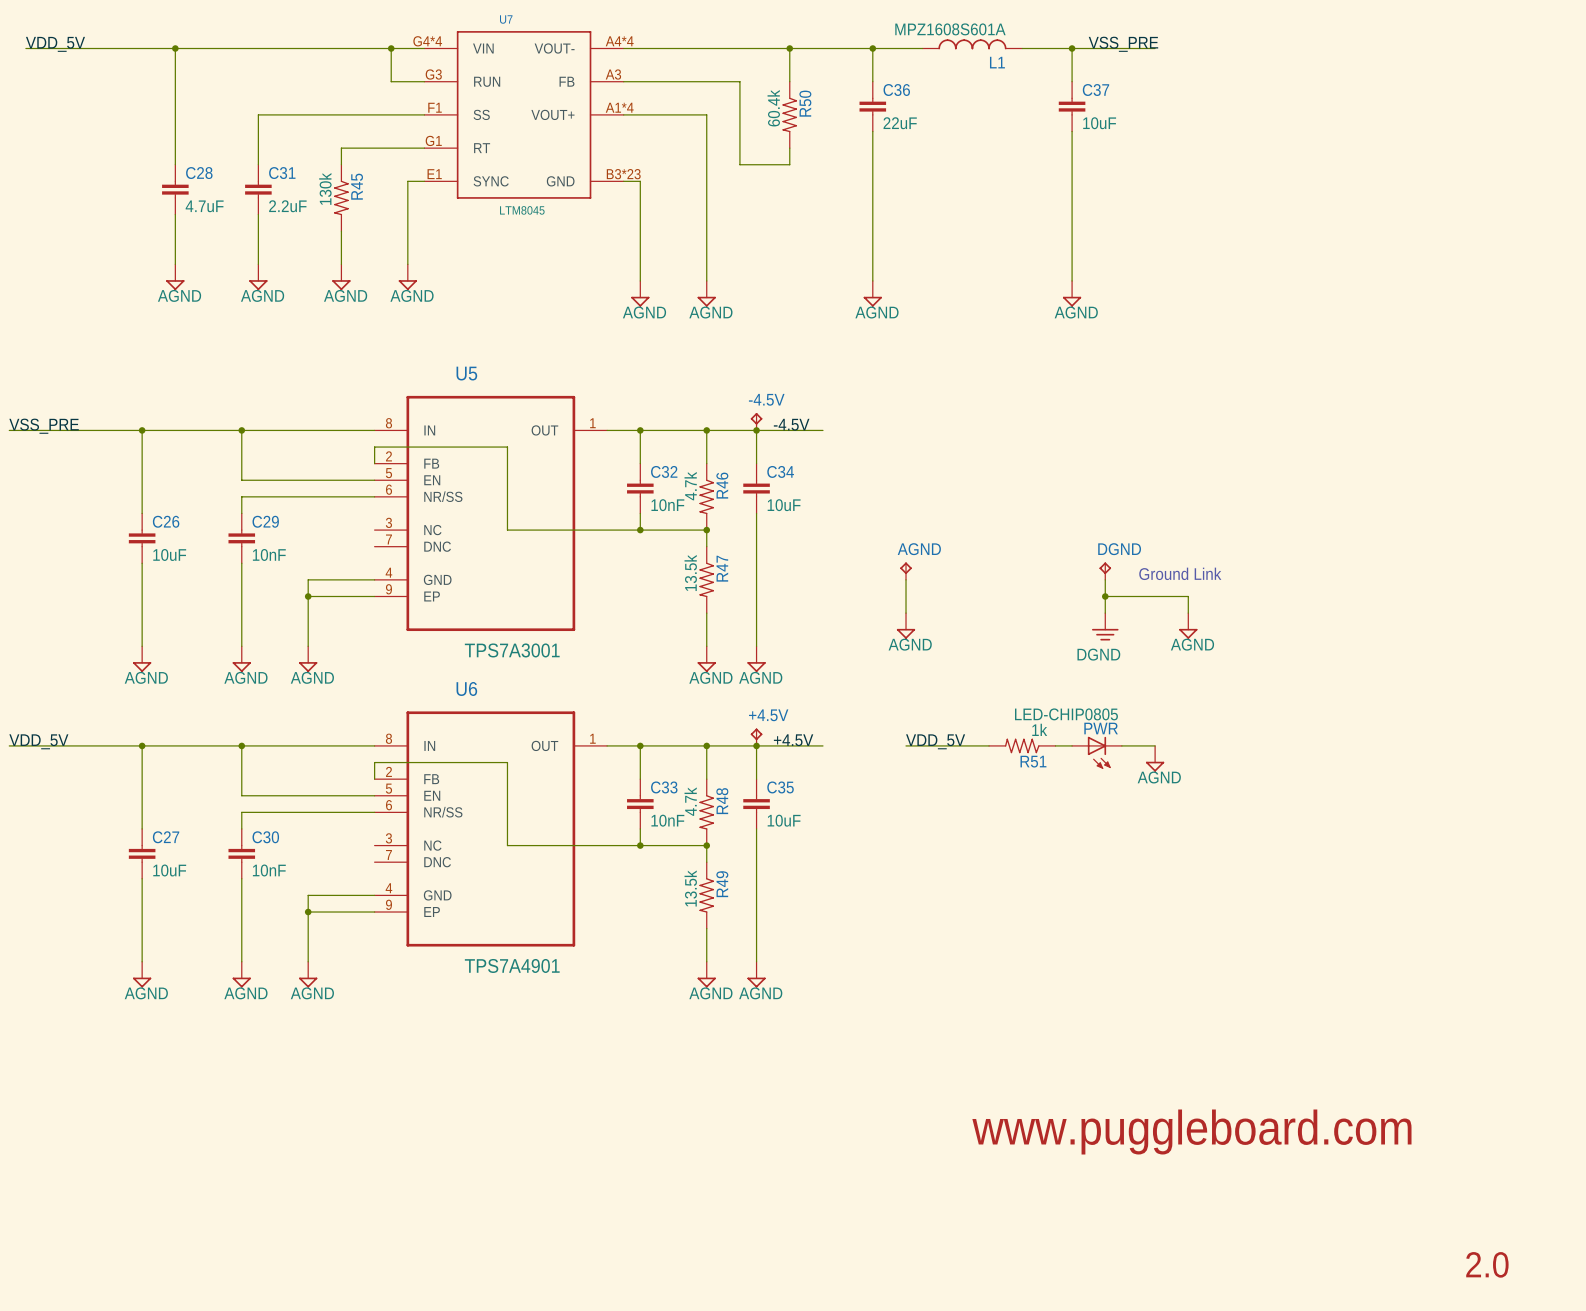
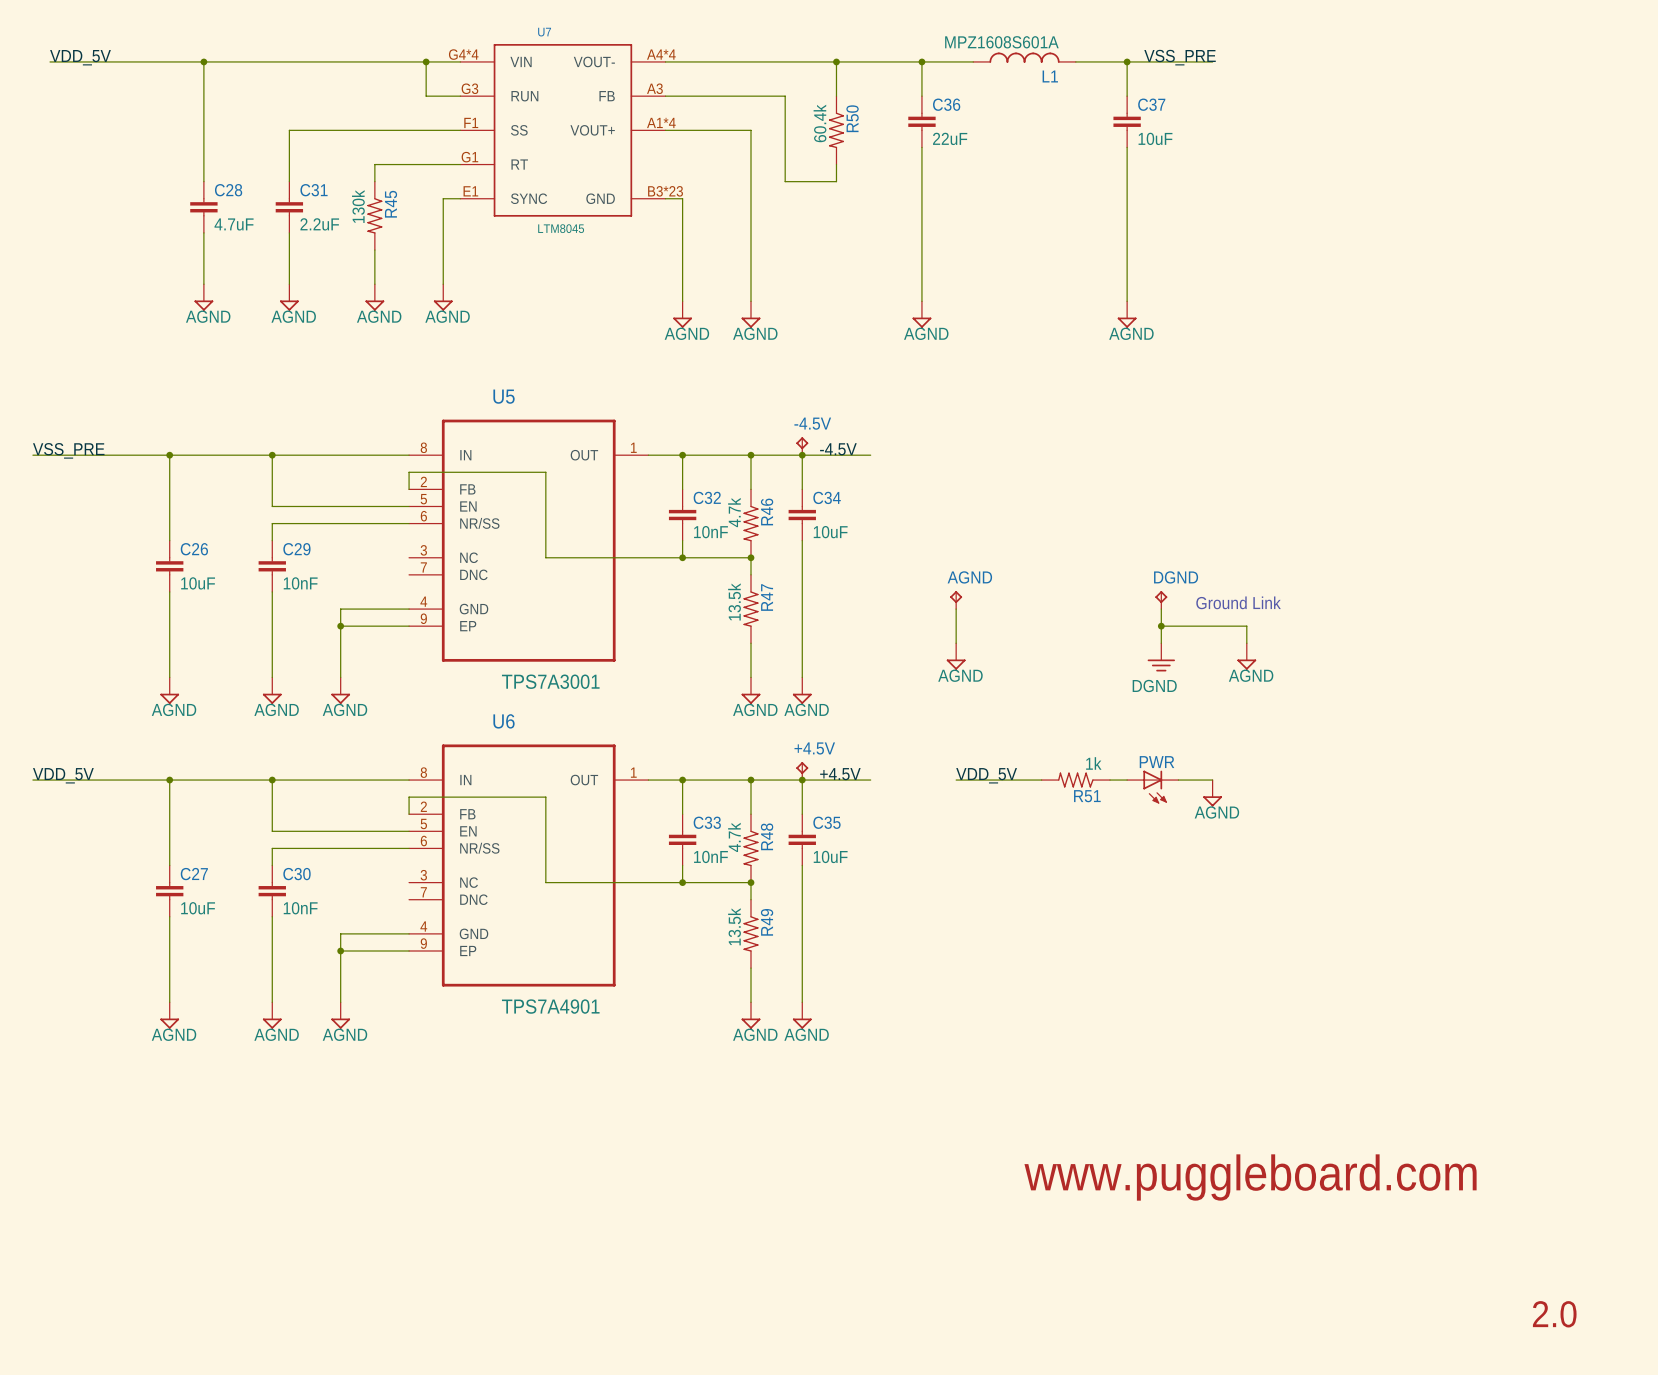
PWR value: LED-CHIP0805 (1066, 714) -> none

